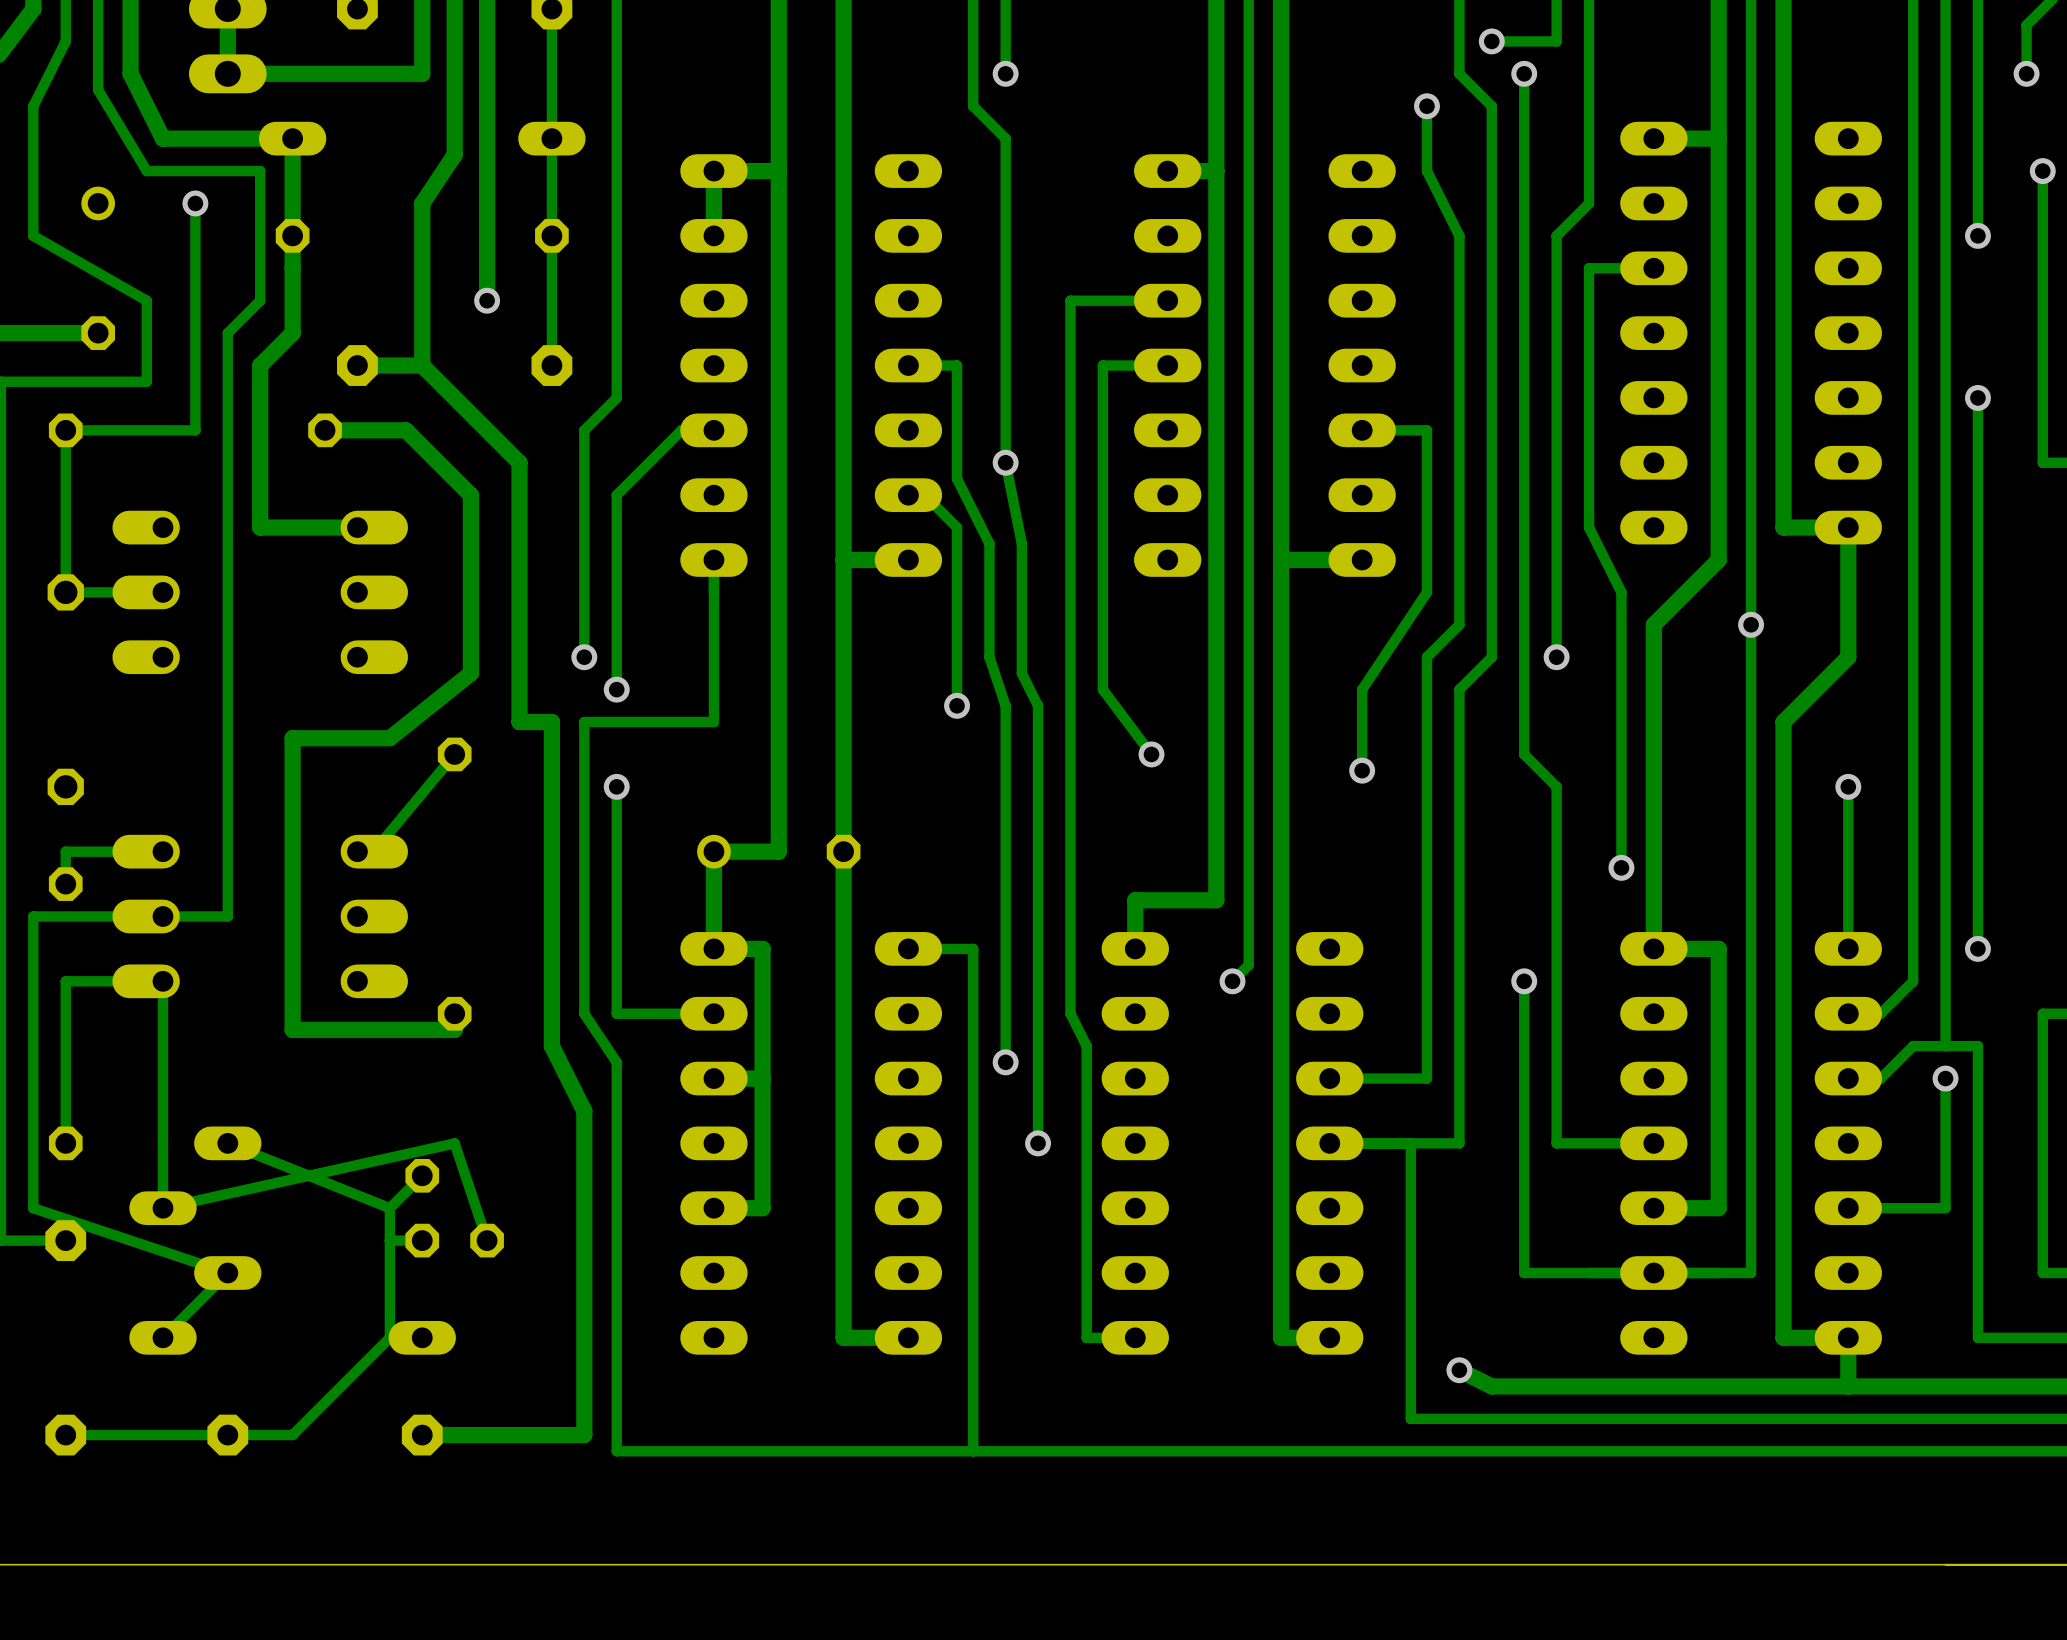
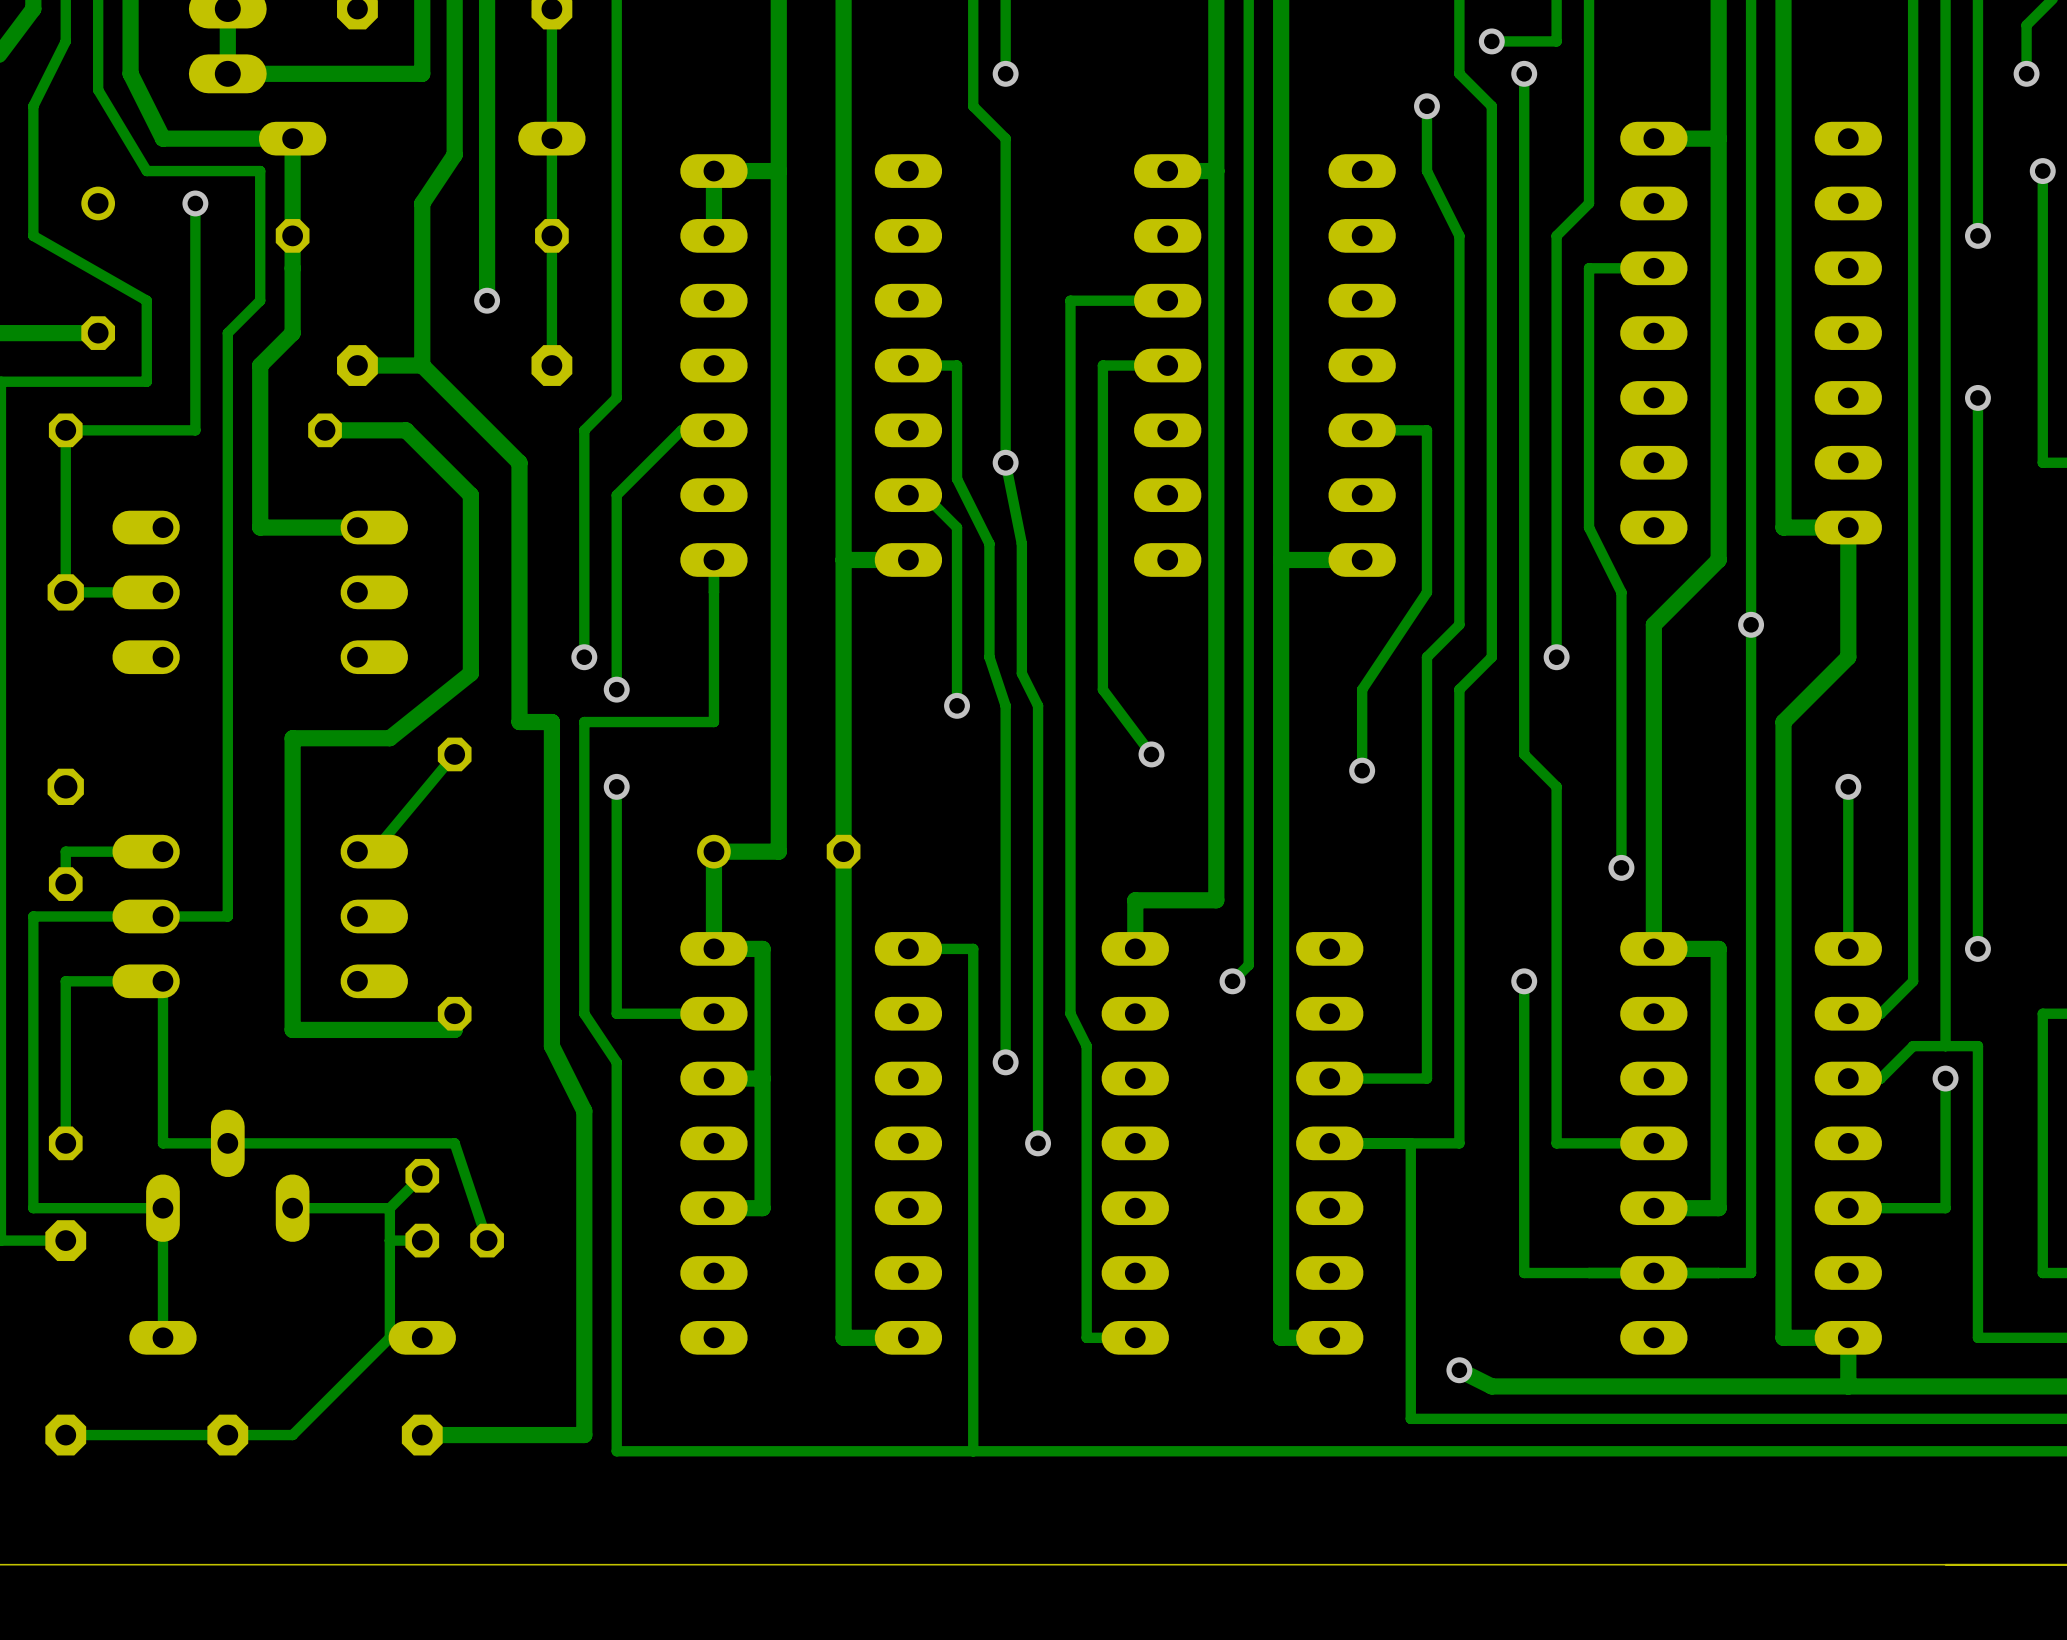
track: (227, 1143) (389, 1208) -> (292, 1208) (389, 1208)
track: (454, 1143) (162, 1208) (162, 1143) -> (454, 1143) (162, 1143)
track: (33, 1208) (227, 1273) (162, 1337) -> (33, 1208) (162, 1208) (162, 1337)
part rotation: 0° (195, 1208) -> 90° clockwise (227, 1175)

